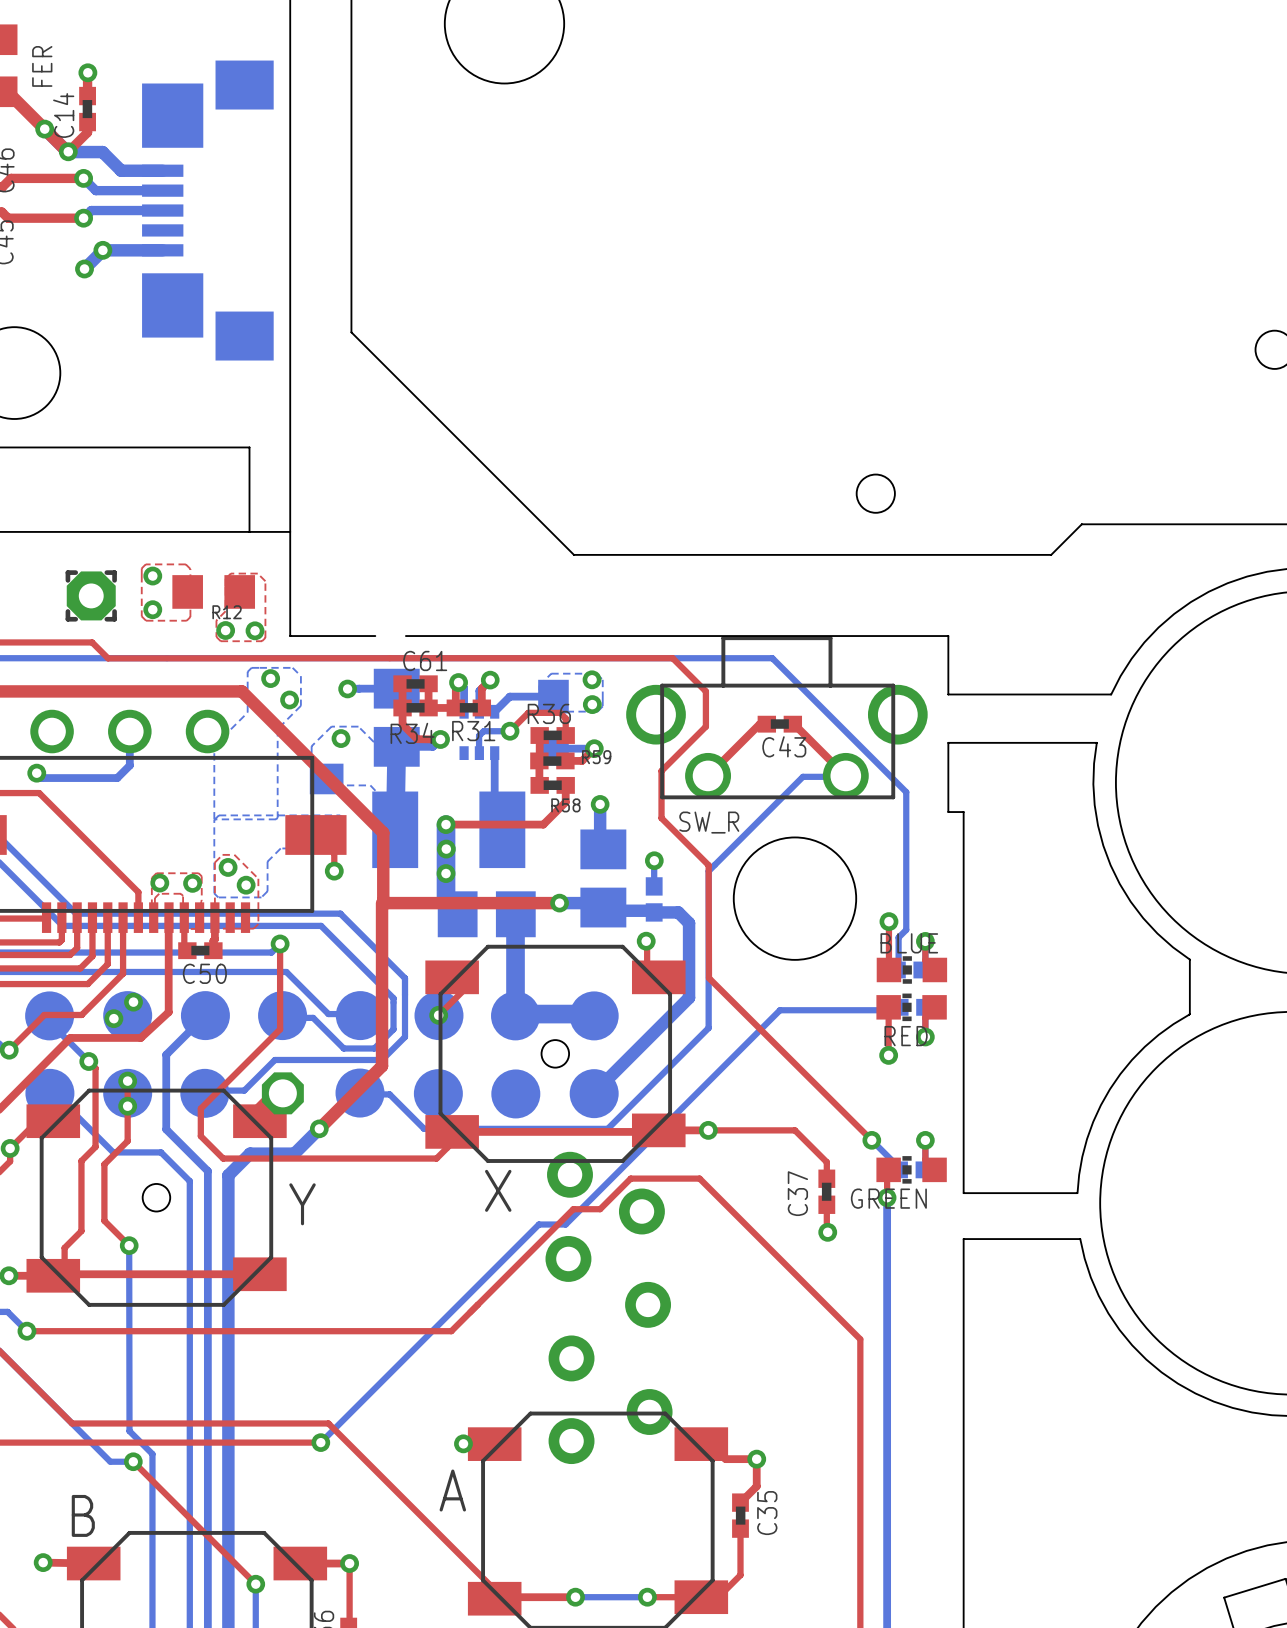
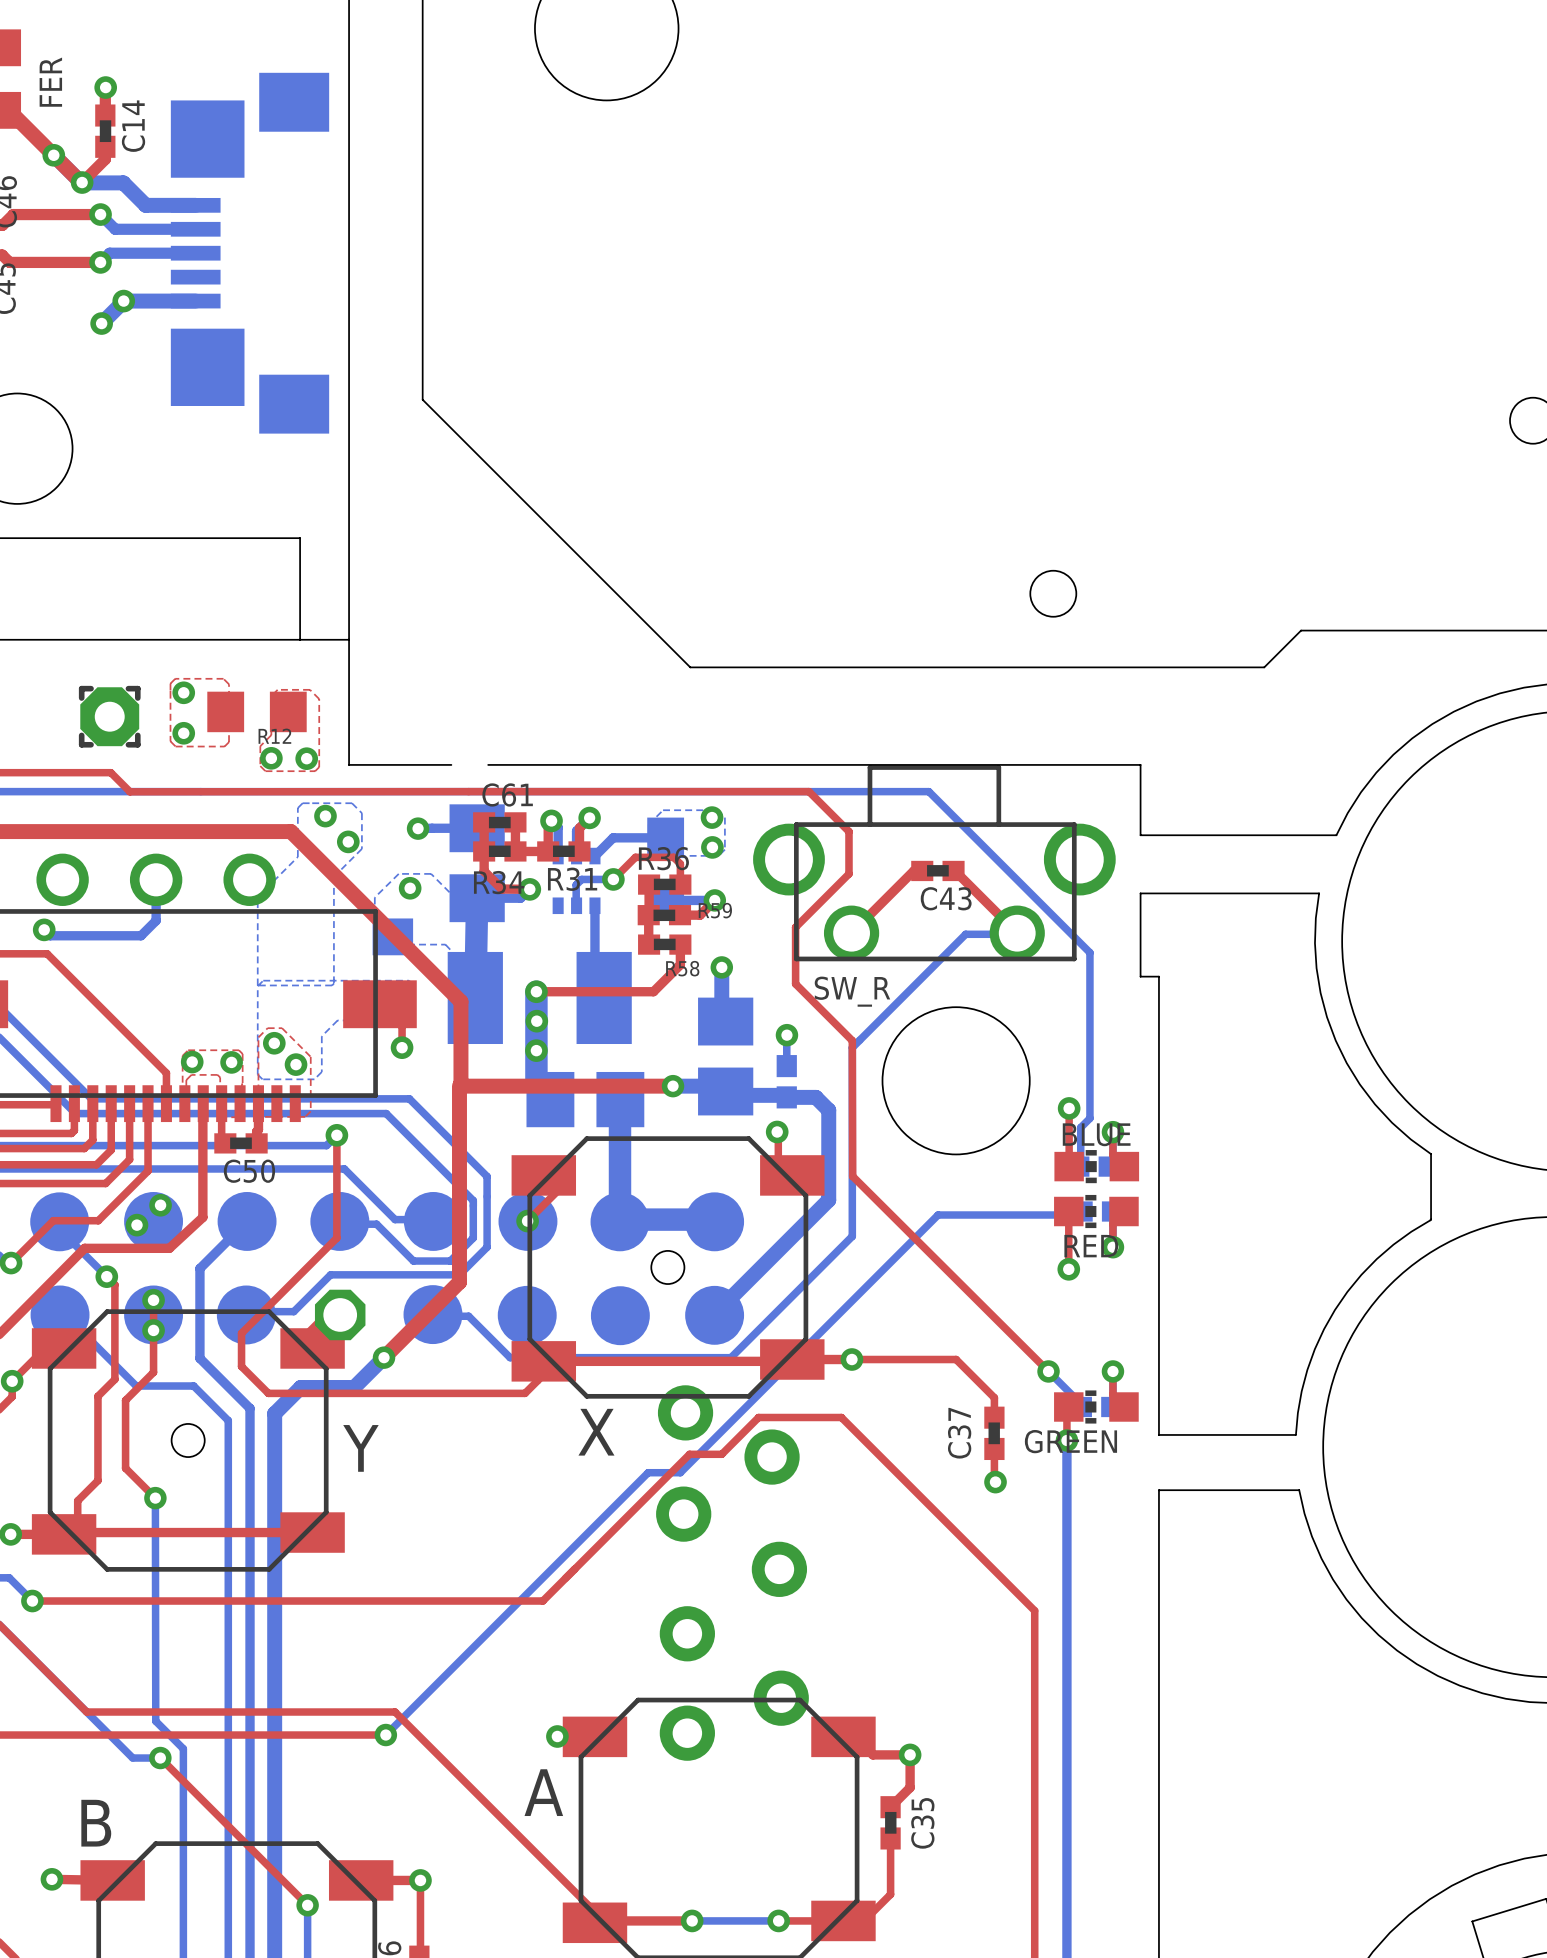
C14 name position: C14 (63, 115) -> C14 (133, 126)

